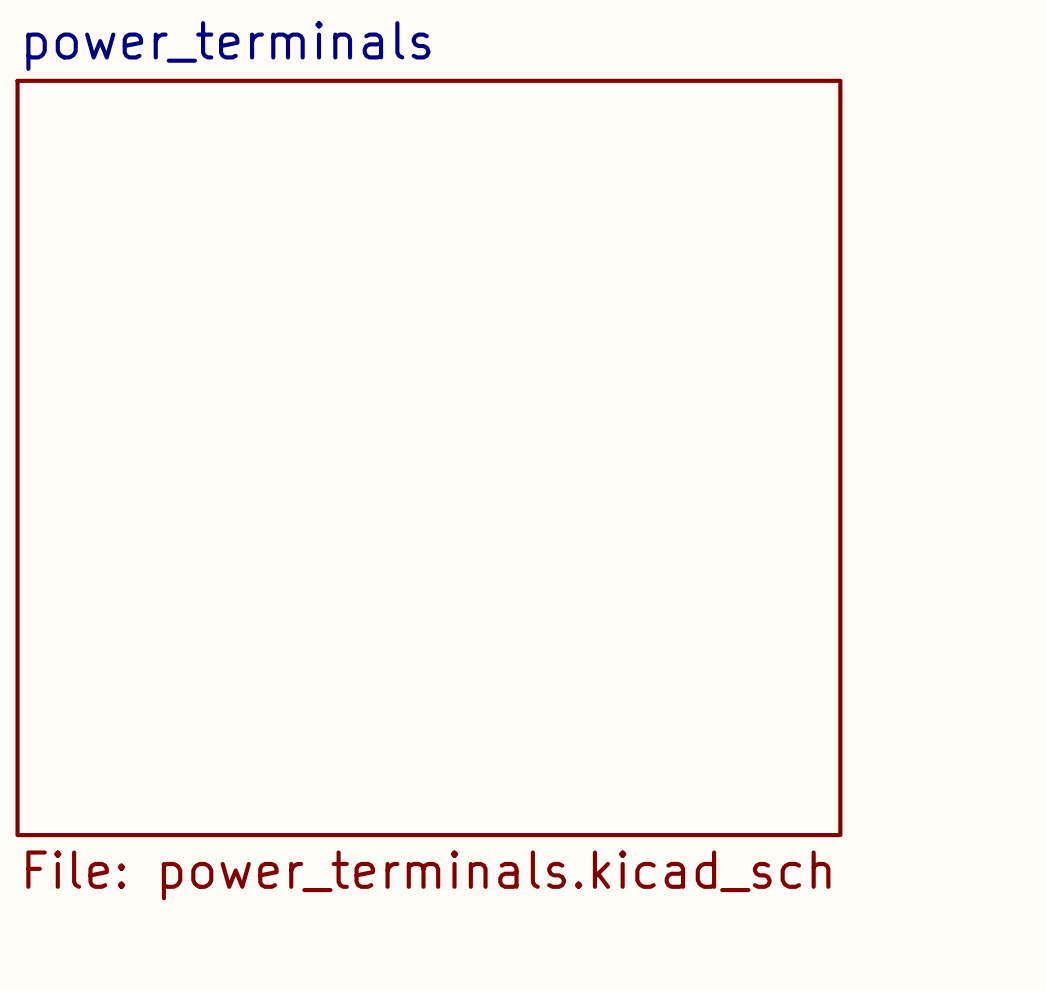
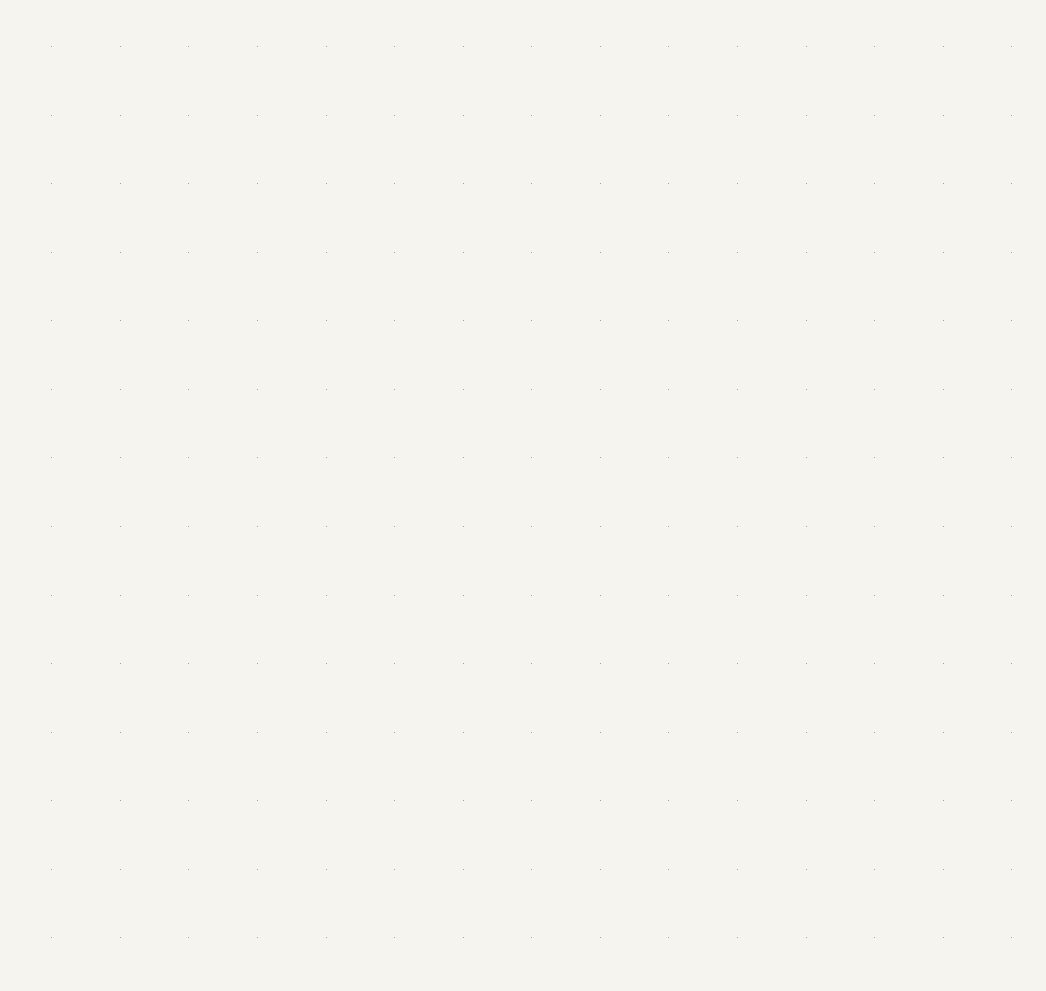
sheet power_terminals: File: power_terminals.kicad_sch (428, 457) -> none

